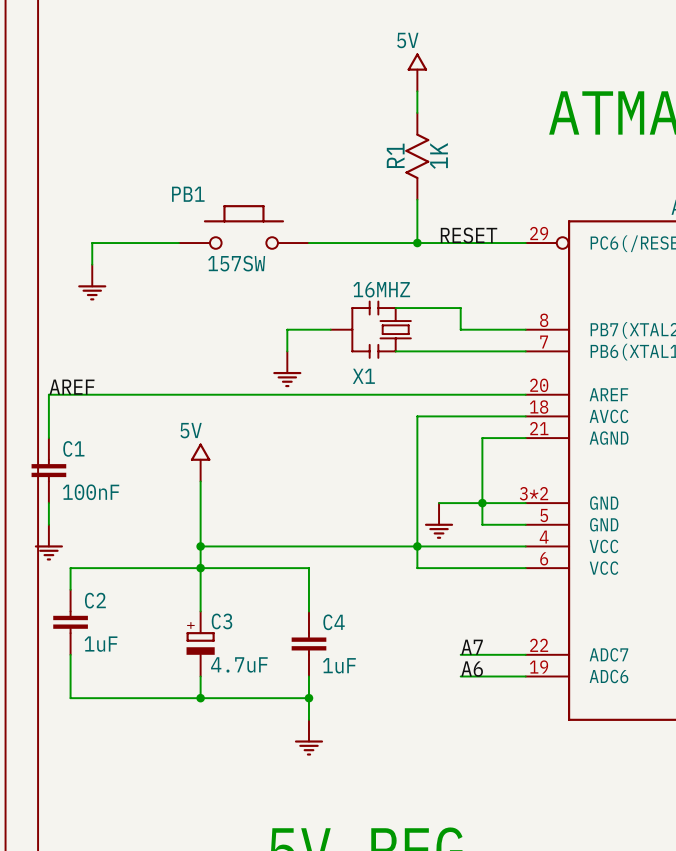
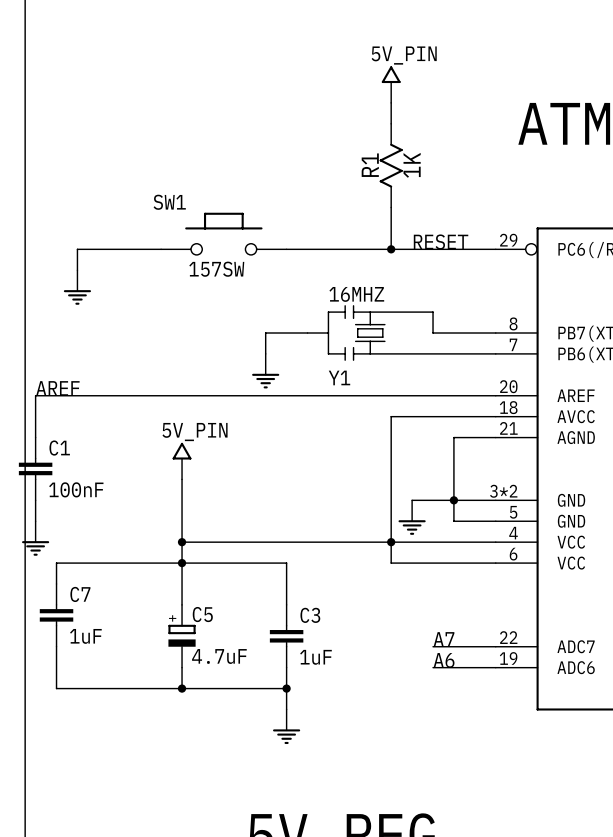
power symbol: 5V (417, 72) -> 5V_PIN (391, 84)
PB1 name: PB1 (188, 194) -> SW1 (169, 202)
X1 name: X1 (363, 376) -> Y1 (339, 377)
power symbol: 5V (200, 462) -> 5V_PIN (182, 461)
C2 name: C2 (95, 600) -> C7 (80, 594)
C3 name: C3 (221, 621) -> C5 (202, 614)
C4 name: C4 (334, 622) -> C3 (310, 615)

